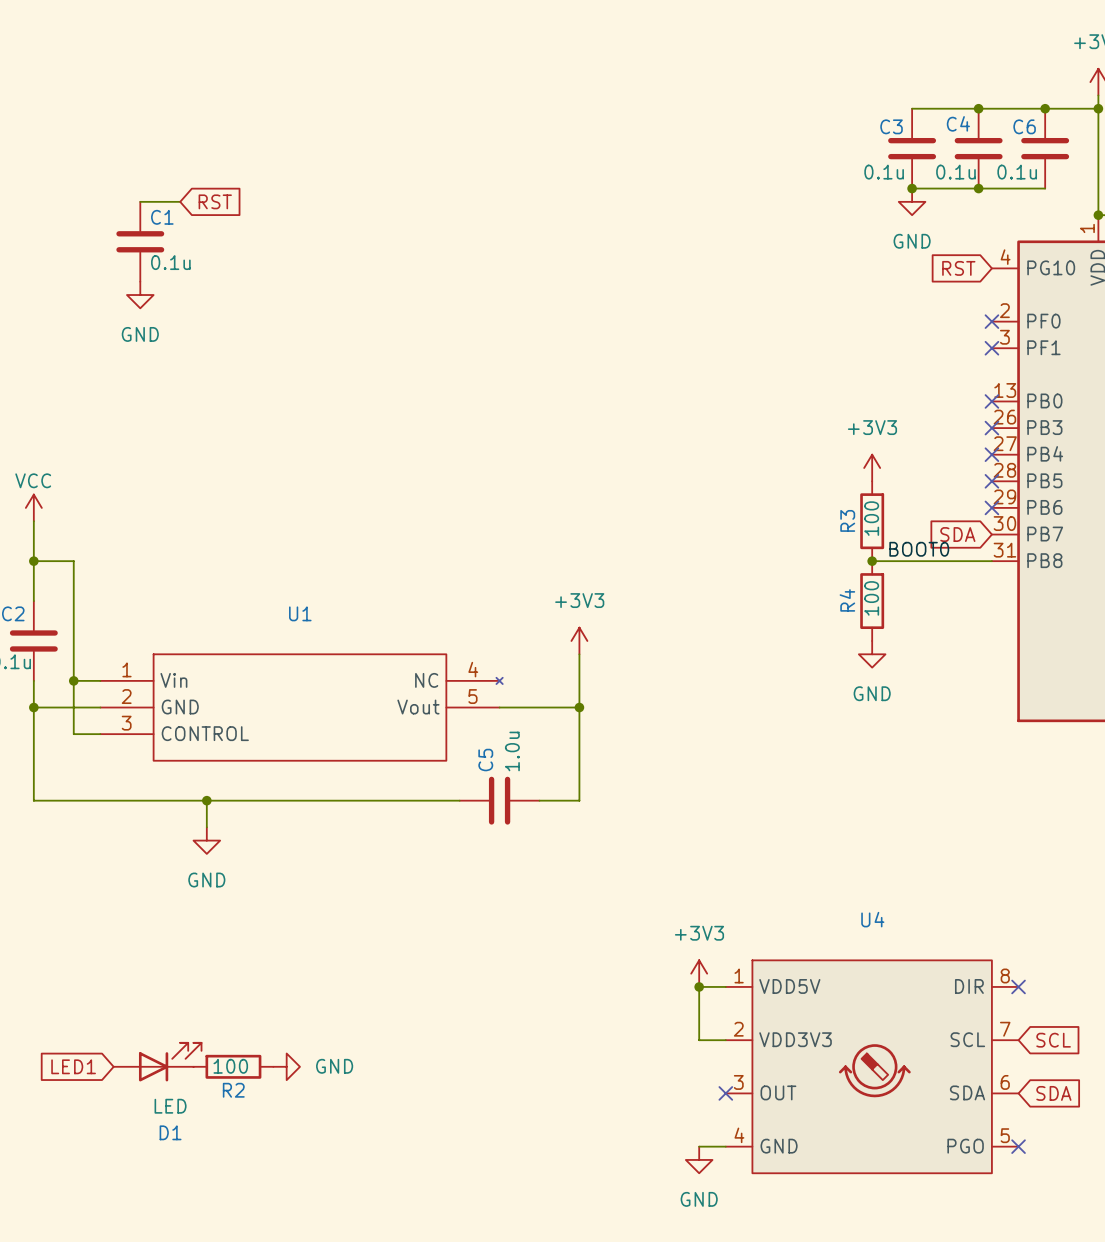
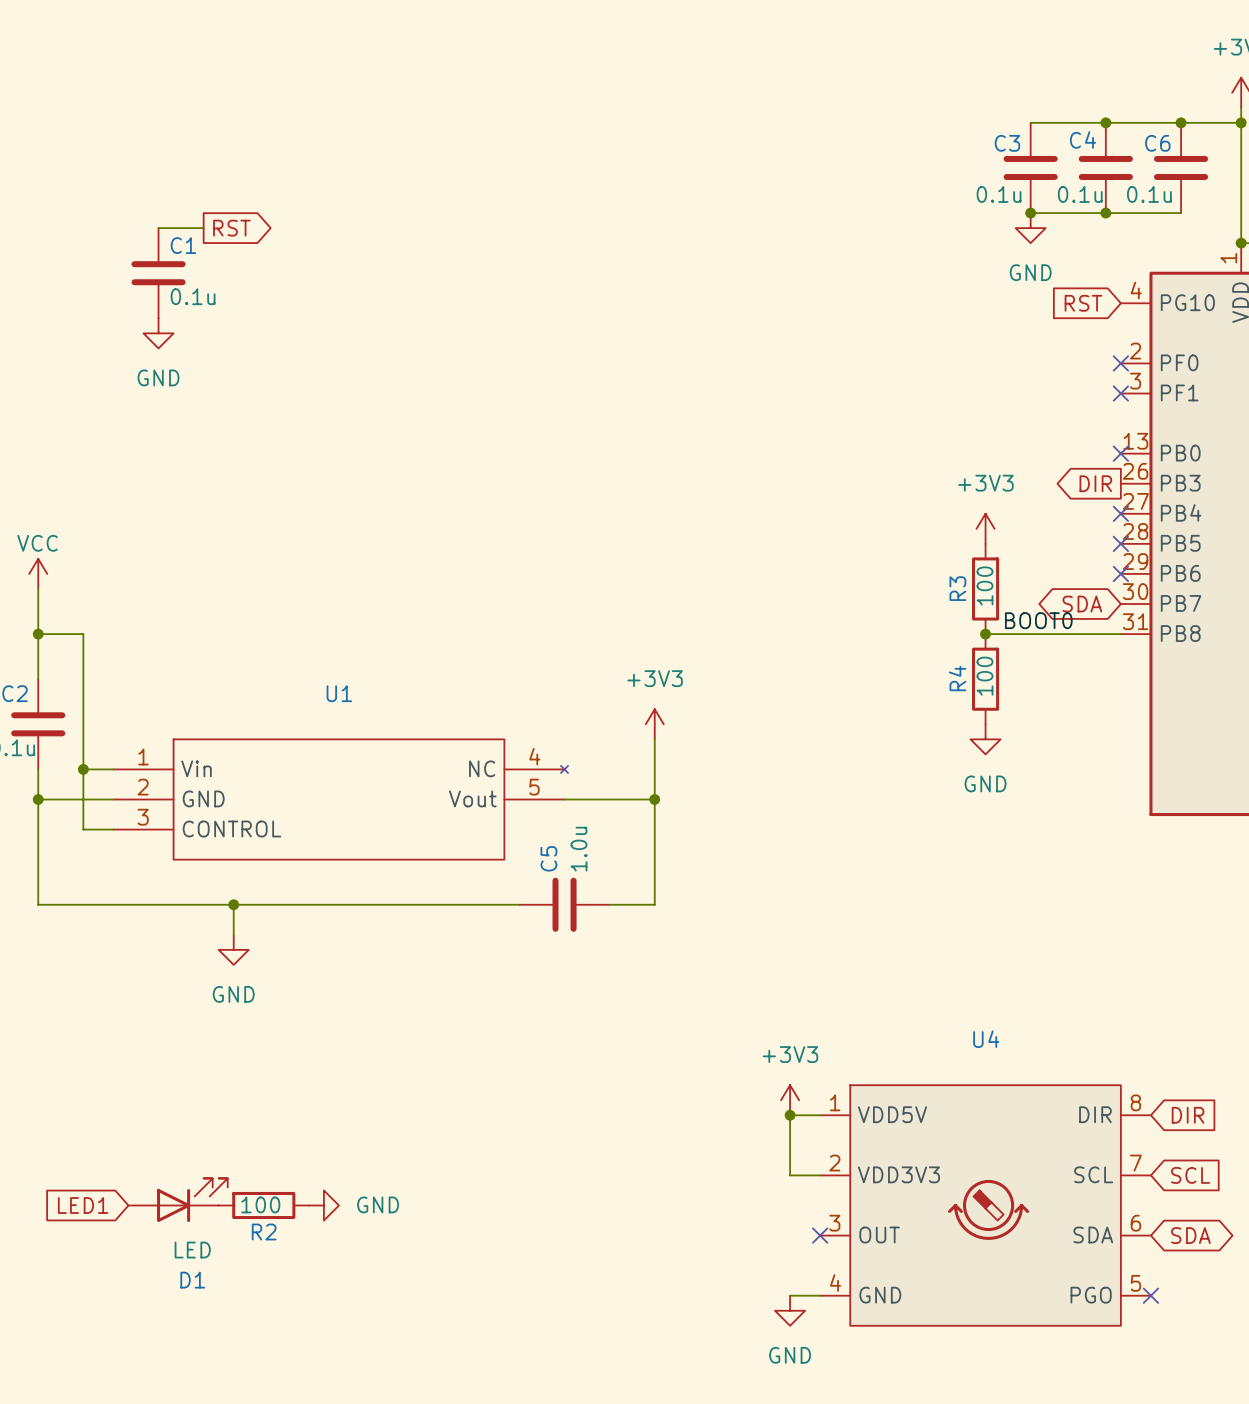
global label shape: input (215, 201) -> output (231, 228)
global label: none -> DIR (1095, 483)
no-connect mark: (991, 428) -> none
global label shape: input (957, 534) -> bidirectional (1082, 604)
no-connect mark: (1018, 986) -> none
global label: none -> DIR (1188, 1115)
global label shape: input (1053, 1093) -> bidirectional (1190, 1235)

